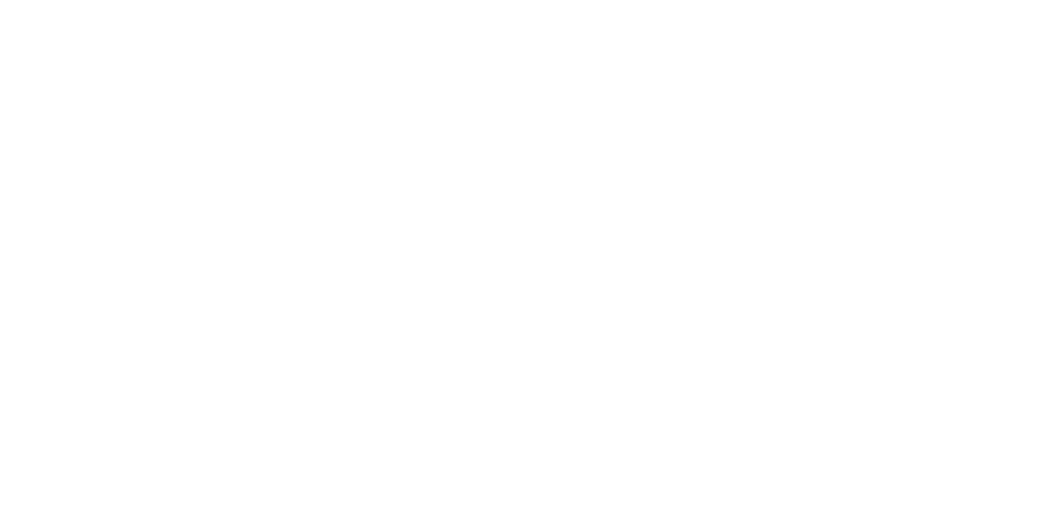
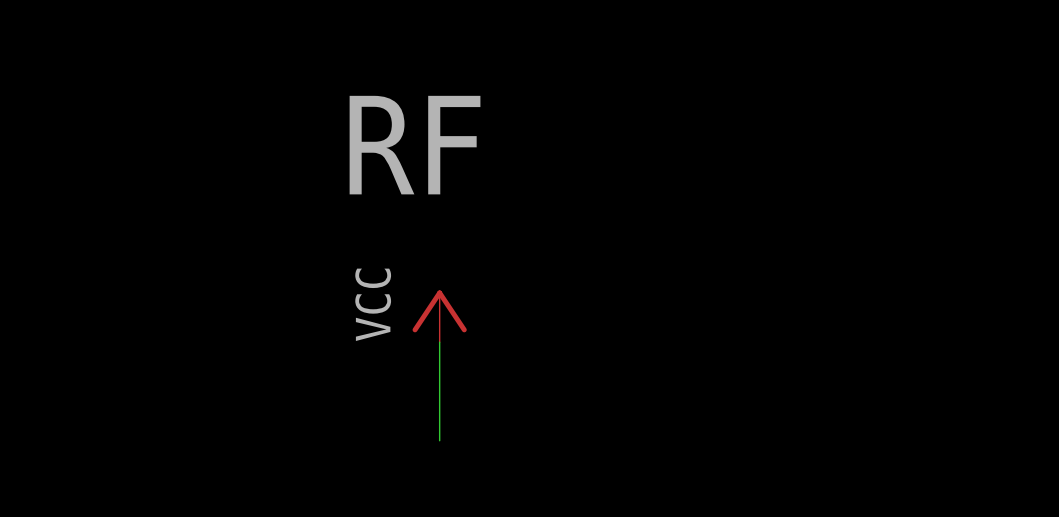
text: none -> RF (415, 145)
power symbol: none -> VCC (439, 316)
wire: none -> (439, 342) (439, 440)

